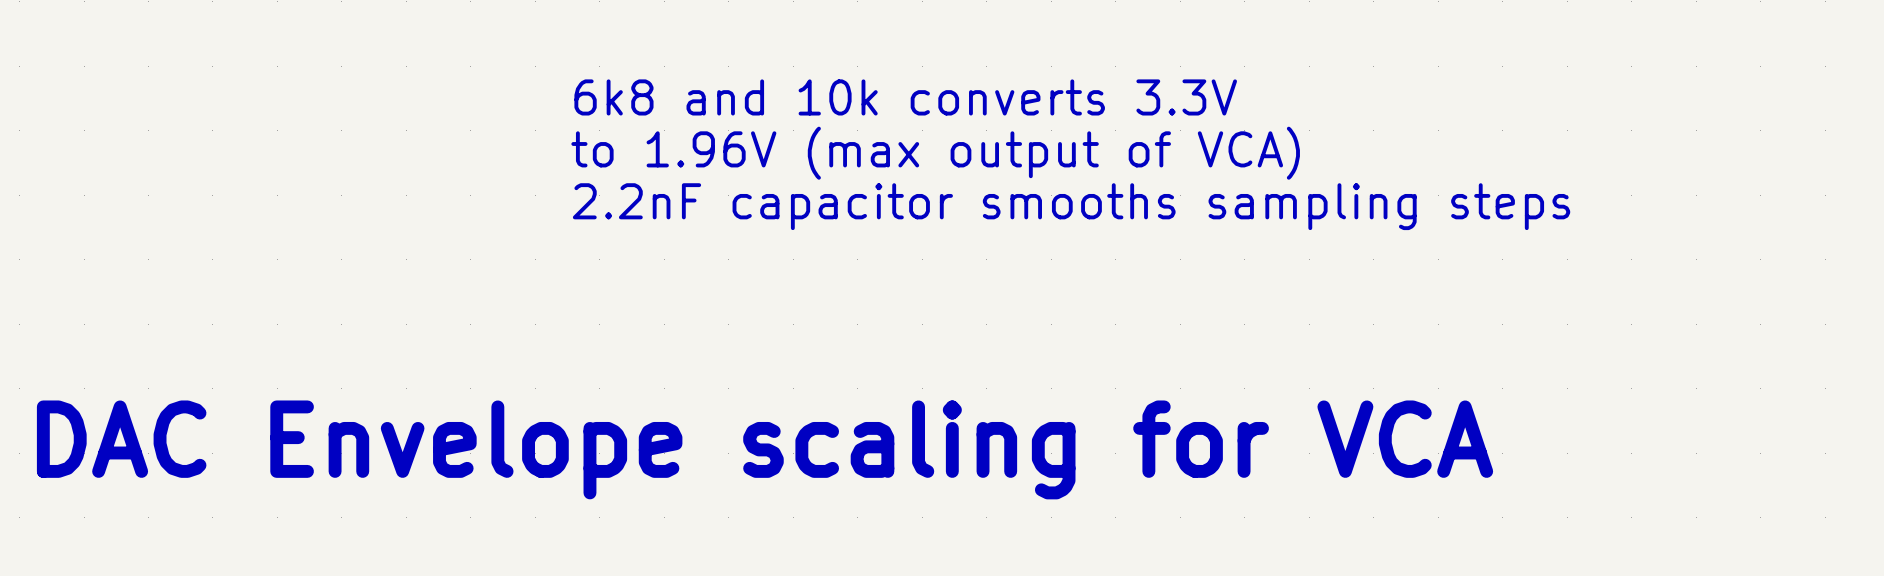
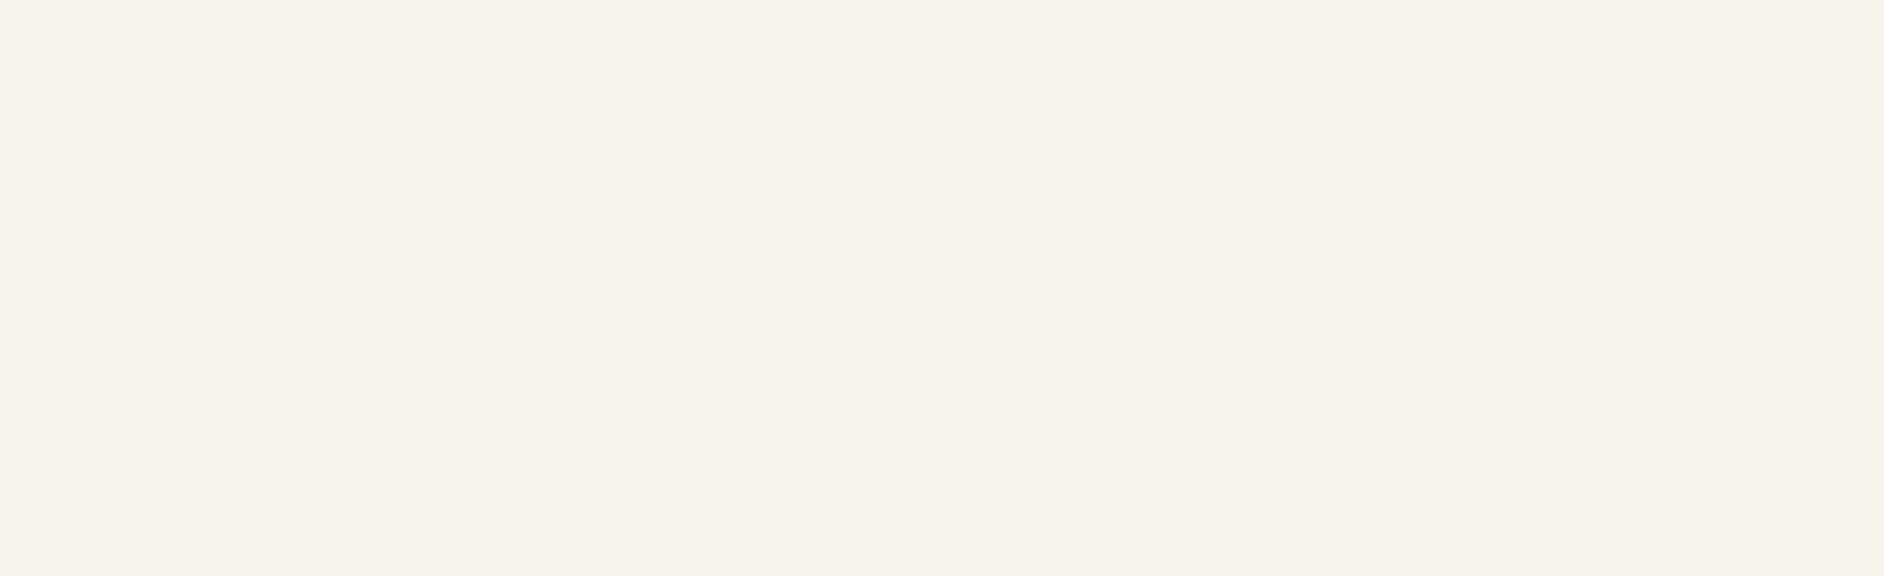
text: 6k8 and 10k converts 3.3V (905, 97) -> none
text: to 1.96V (max output of VCA) (935, 153) -> none
text: 2.2nF capacitor smooths sampling steps (1071, 206) -> none
text: DAC Envelope scaling for VCA (765, 449) -> none

